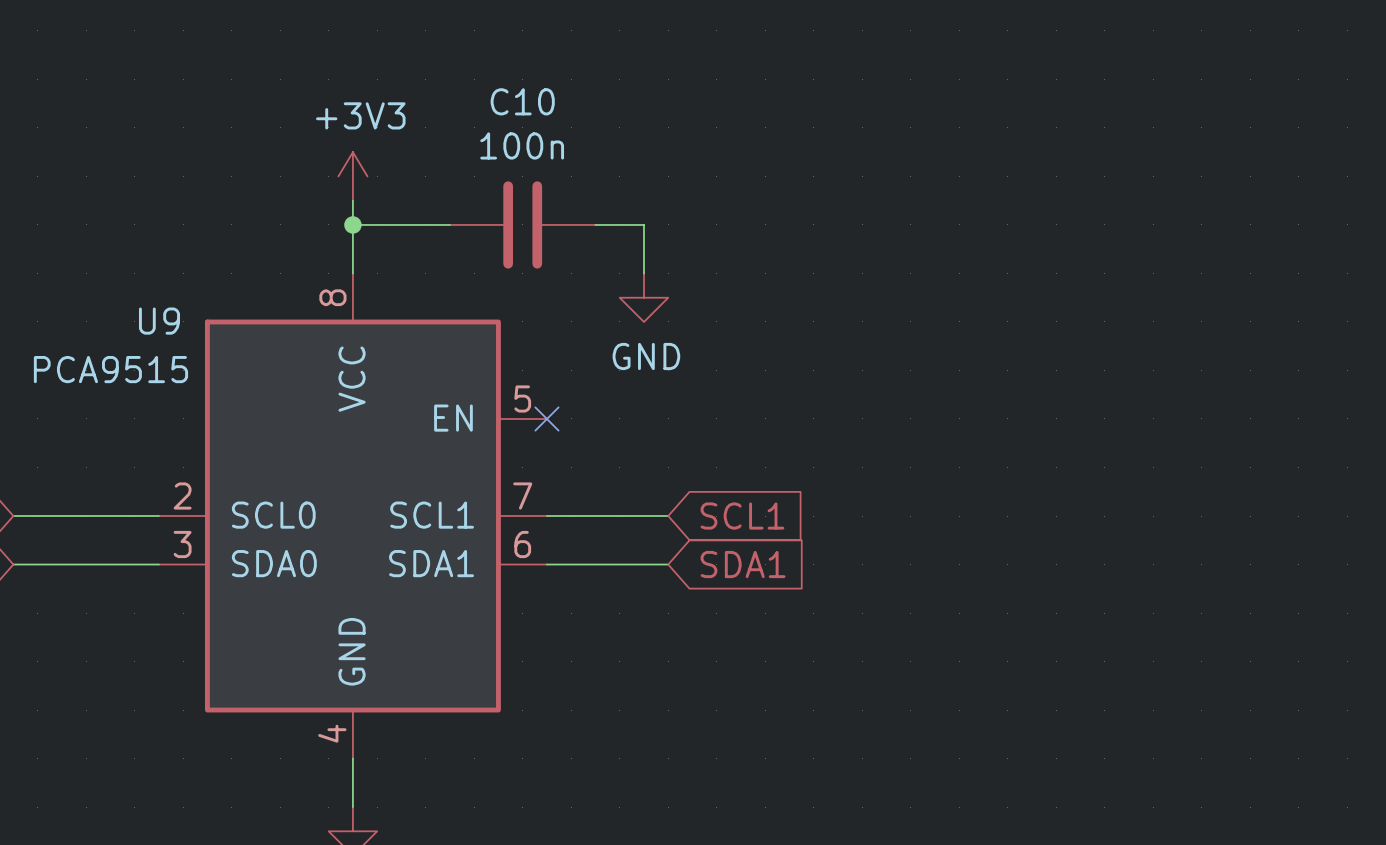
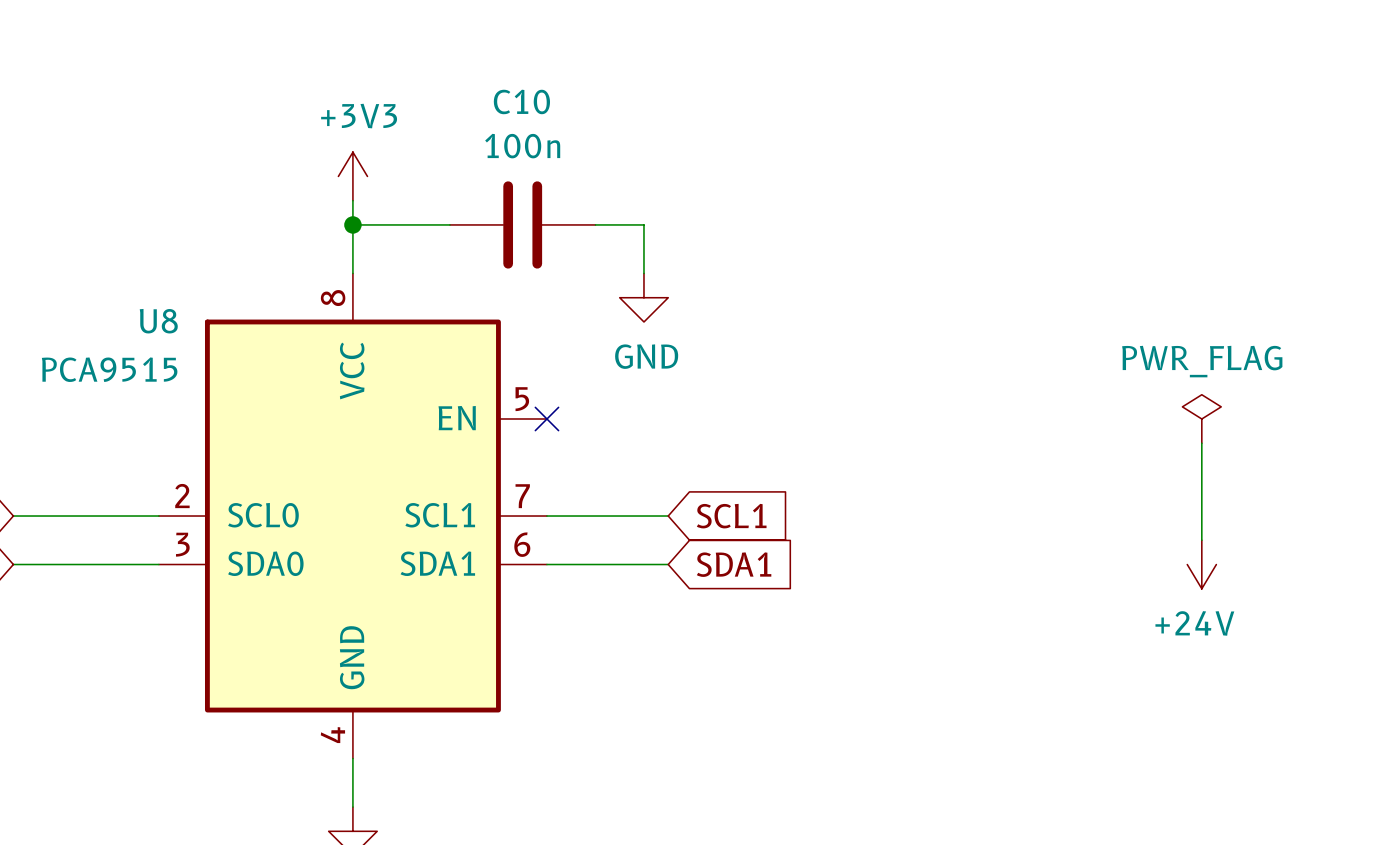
U9 name: U9 (159, 321) -> U8 (158, 321)
power symbol: none -> PWR_FLAG (1201, 418)
wire: none -> (1201, 443) (1201, 540)
power symbol: none -> +24V (1201, 564)

